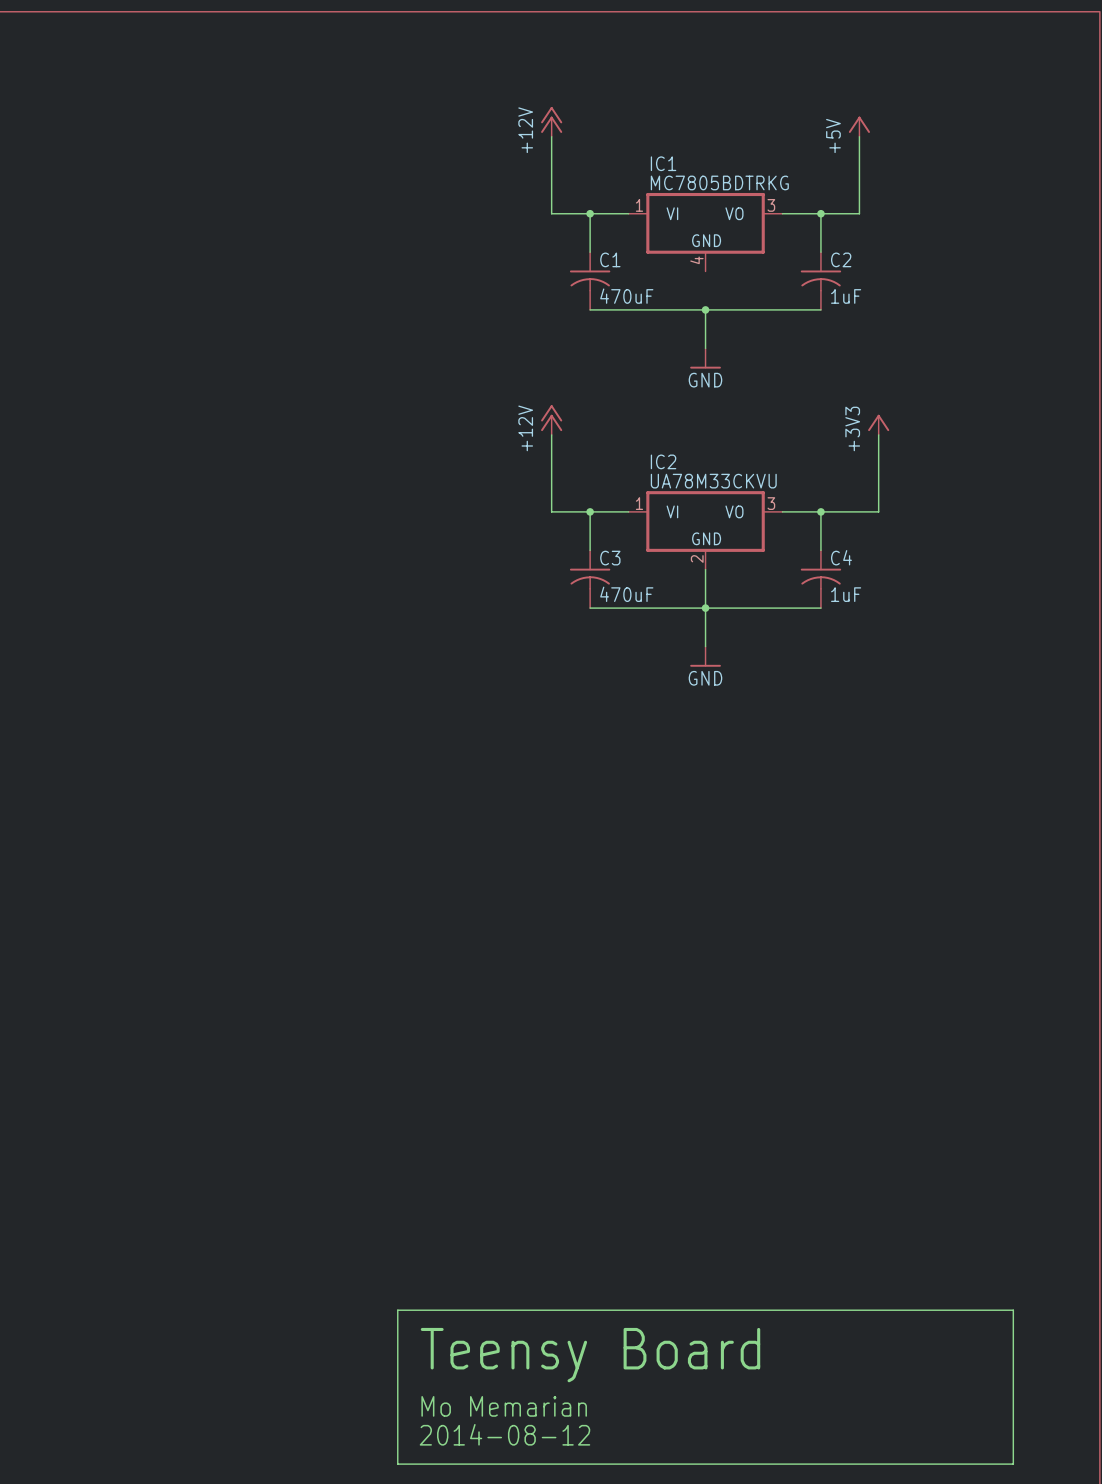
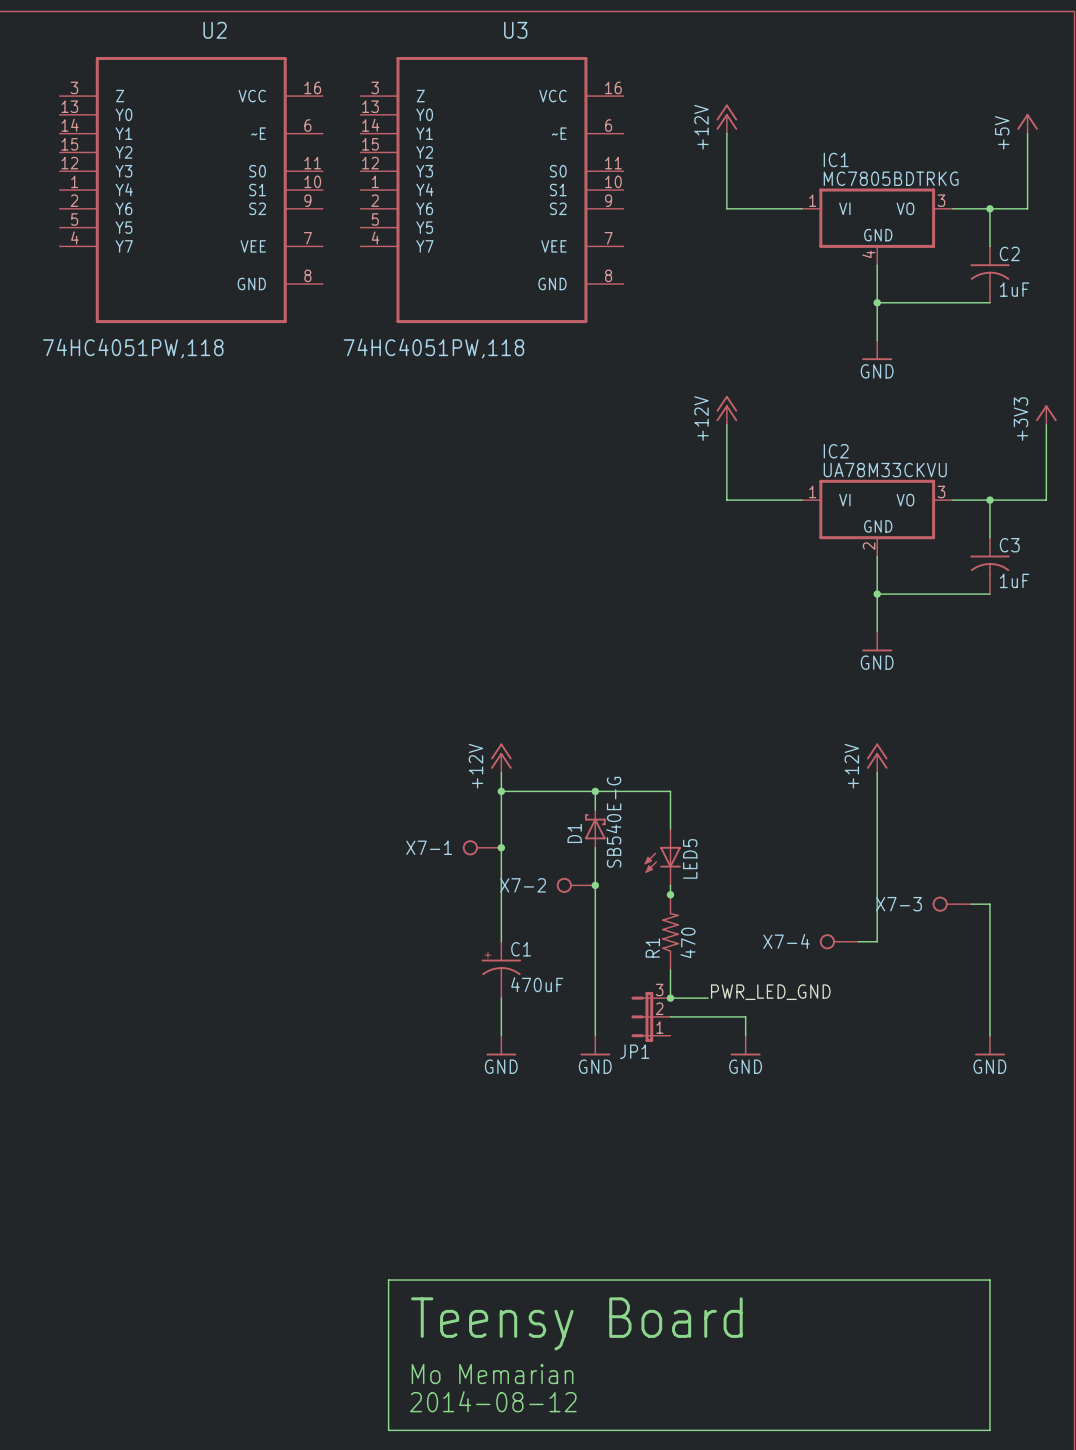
power symbol: +12V (551, 121) -> none
power symbol: none -> +12V (726, 119)
power symbol: +5V (859, 126) -> none
power symbol: none -> +5V (1027, 123)
wire: (551, 136) (551, 213) (628, 213) -> none
wire: none -> (726, 133) (726, 208) (764, 208)
wire: (859, 136) (859, 213) (820, 213) (820, 252) -> none
wire: none -> (1027, 133) (1027, 208) (952, 208)
U2: none -> 74HC4051PW,118 (191, 190)
U3: none -> 74HC4051PW,118 (491, 190)
wire: (590, 213) (590, 252) -> none
junction: (590, 213) -> none
junction: (820, 213) -> none
wire: none -> (989, 208) (989, 246)
junction: none -> (989, 208)
IC1 position: (705, 232) -> (877, 226)
C1 symbol: [569, 252, 611, 310] -> [481, 941, 522, 999]
wire: none -> (877, 265) (877, 340)
C2 position: (820, 281) -> (989, 274)
wire: (590, 309) (820, 309) -> none
wire: (705, 309) (705, 348) -> none
junction: (705, 309) -> none
wire: none -> (877, 302) (989, 302)
junction: none -> (877, 302)
power symbol: GND (705, 358) -> none
power symbol: none -> GND (877, 350)
power symbol: +12V (551, 420) -> none
power symbol: none -> +12V (726, 410)
power symbol: +3V3 (878, 424) -> none
power symbol: none -> +3V3 (1046, 415)
wire: (551, 434) (551, 511) (628, 511) -> none
wire: none -> (726, 424) (726, 500) (764, 500)
wire: (878, 434) (878, 511) (820, 511) (820, 550) -> none
wire: none -> (1046, 424) (1046, 500) (952, 500)
wire: (590, 511) (590, 550) -> none
junction: (590, 511) -> none
junction: (820, 511) -> none
wire: none -> (989, 500) (989, 537)
junction: none -> (989, 500)
IC2 position: (705, 530) -> (877, 518)
wire: (705, 569) (705, 646) -> none
wire: none -> (877, 556) (877, 631)
C3 position: (590, 579) -> (989, 565)
C4: 1uF (820, 579) -> none
C3 value: 470uF (626, 594) -> 1uF (1014, 580)
wire: (590, 608) (820, 608) -> none
junction: (705, 608) -> none
wire: none -> (877, 594) (989, 594)
junction: none -> (877, 594)
power symbol: GND (705, 656) -> none
power symbol: none -> GND (877, 641)
power symbol: none -> +12V (501, 758)
power symbol: none -> +12V (877, 758)
wire: none -> (501, 772) (501, 941)
wire: none -> (877, 772) (877, 941) (858, 941)
wire: none -> (501, 791) (670, 791) (670, 828)
junction: none -> (501, 791)
wire: none -> (595, 791) (595, 810)
junction: none -> (595, 791)
D1: none -> SB540E-G (595, 828)
X7-1: none -> (482, 847)
junction: none -> (501, 847)
wire: none -> (595, 847) (595, 1035)
LED5: none -> (662, 857)
X7-2: none -> (576, 885)
junction: none -> (595, 885)
wire: none -> (670, 885) (670, 894)
junction: none -> (670, 894)
X7-3: none -> (951, 904)
wire: none -> (971, 904) (989, 904) (989, 1035)
R1: none -> 470 (670, 932)
X7-4: none -> (839, 941)
wire: none -> (670, 969) (670, 998) (708, 998)
label: none -> PWR_LED_GND (770, 992)
wire: none -> (501, 998) (501, 1035)
junction: none -> (670, 998)
JP1: none -> (650, 1016)
wire: none -> (670, 1016) (745, 1016) (745, 1035)
power symbol: none -> GND (501, 1045)
power symbol: none -> GND (595, 1045)
power symbol: none -> GND (745, 1045)
power symbol: none -> GND (989, 1045)

